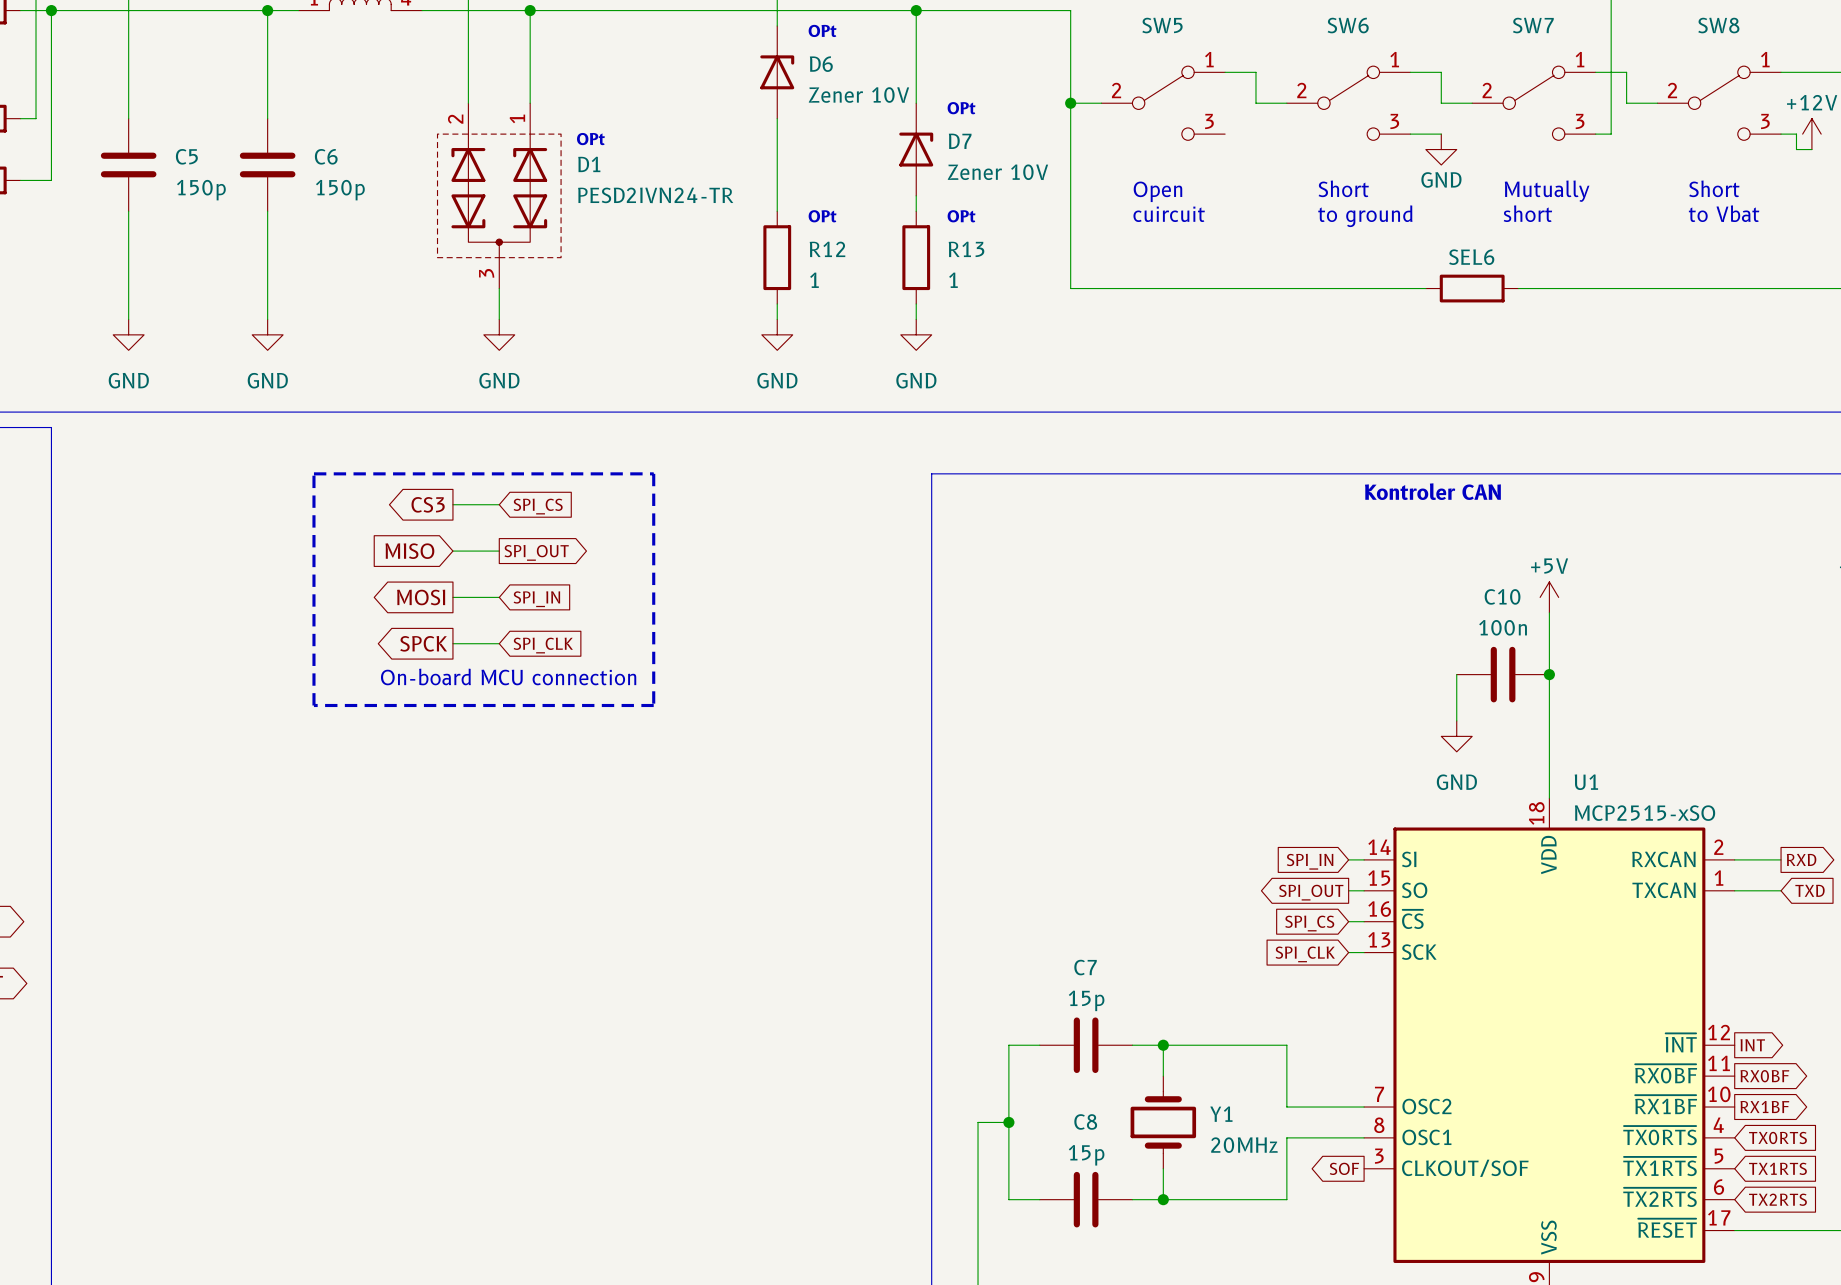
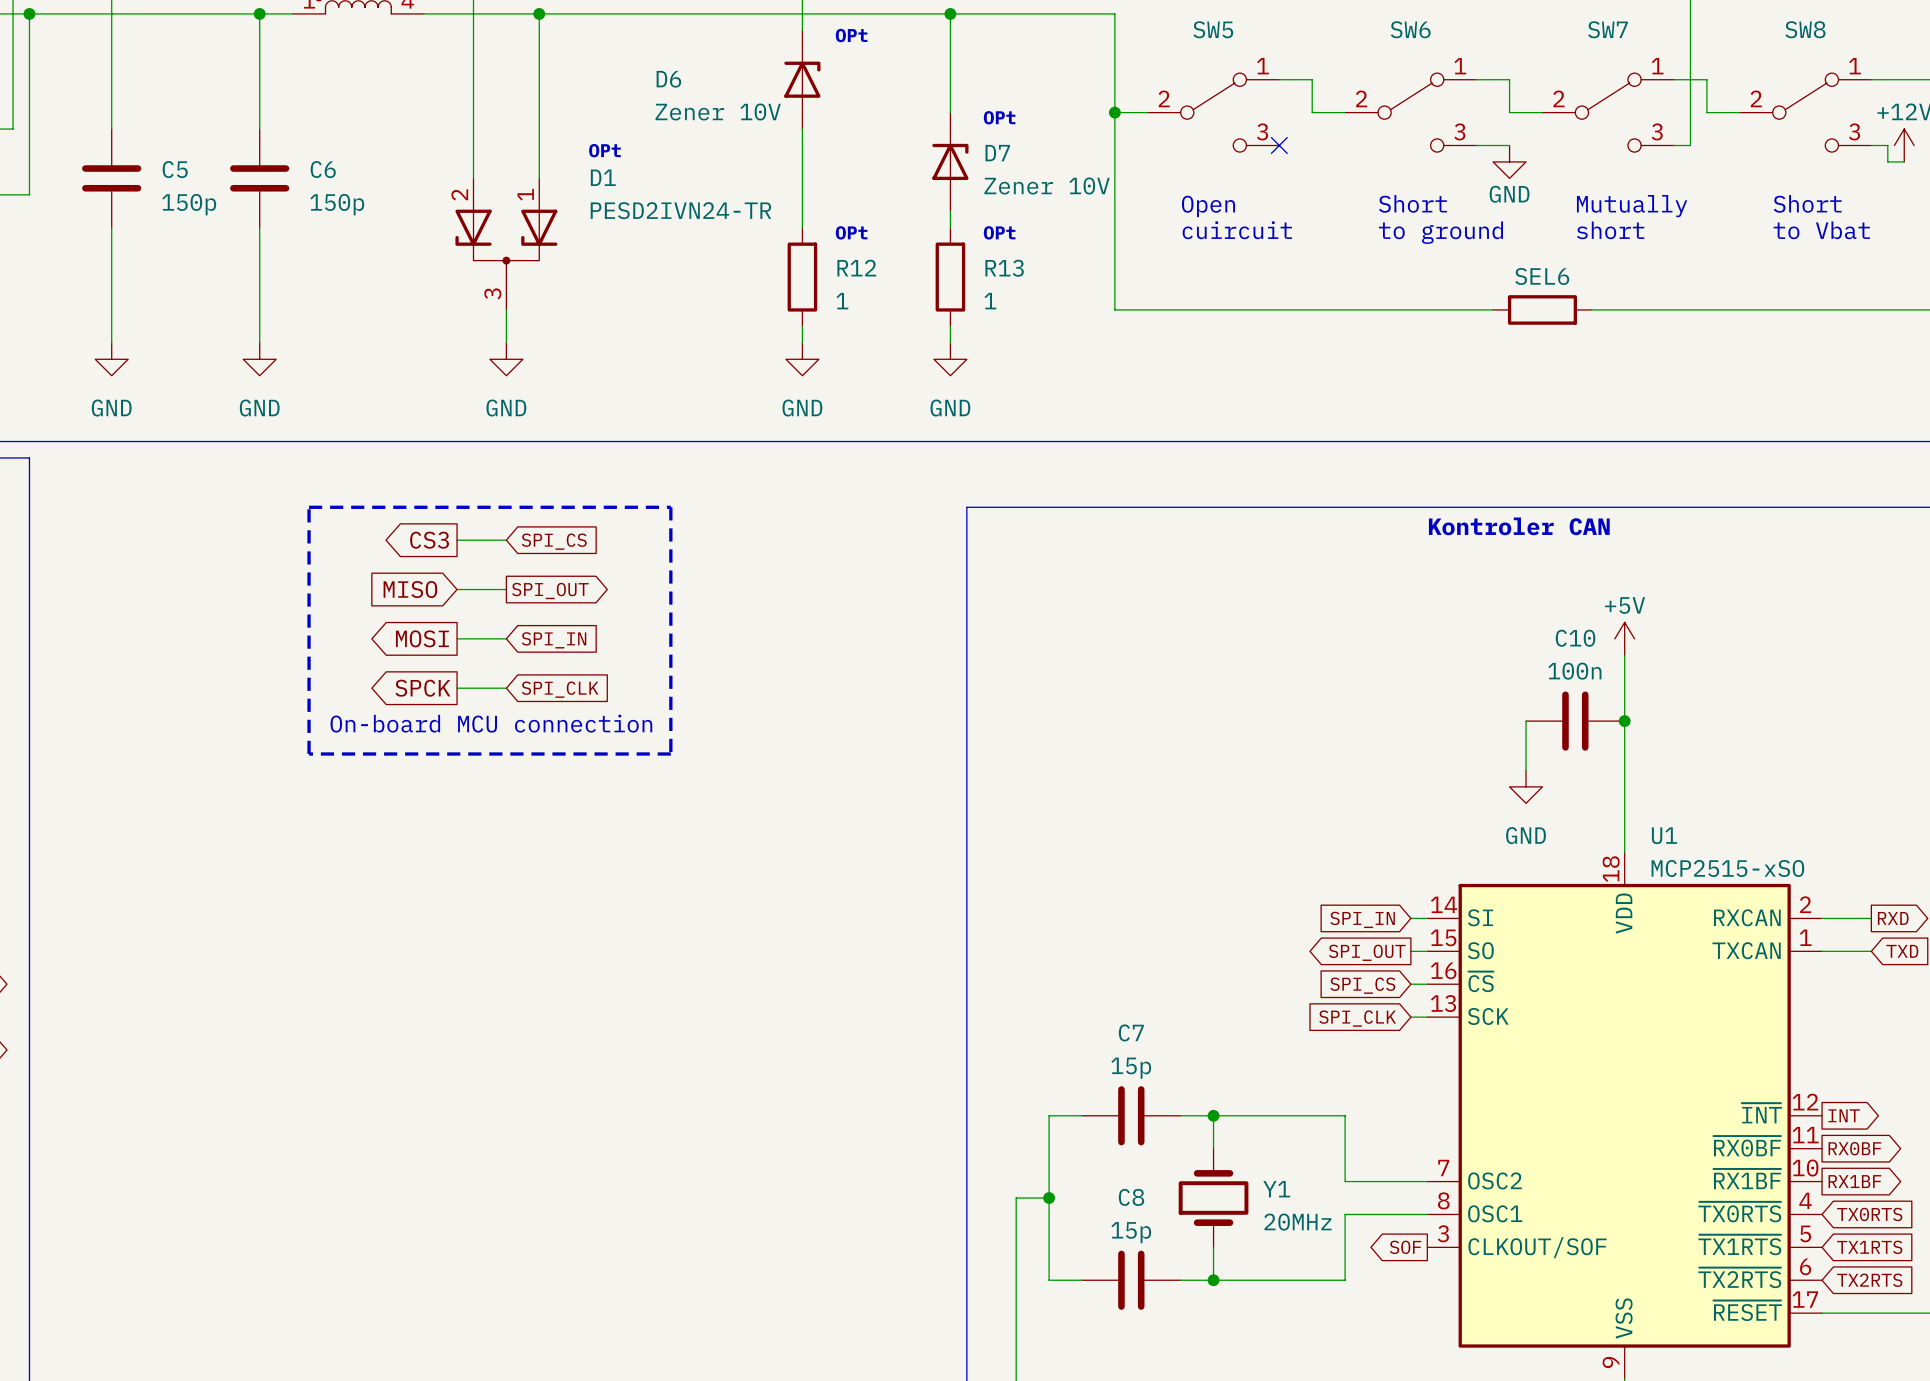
D6 name position: D6 (821, 64) -> D6 (668, 79)
D6 value position: Zener 10V (858, 95) -> Zener 10V (718, 112)
D1 symbol: [437, 103, 562, 289] -> [455, 178, 558, 310]
no-connect mark: none -> (1279, 145)

